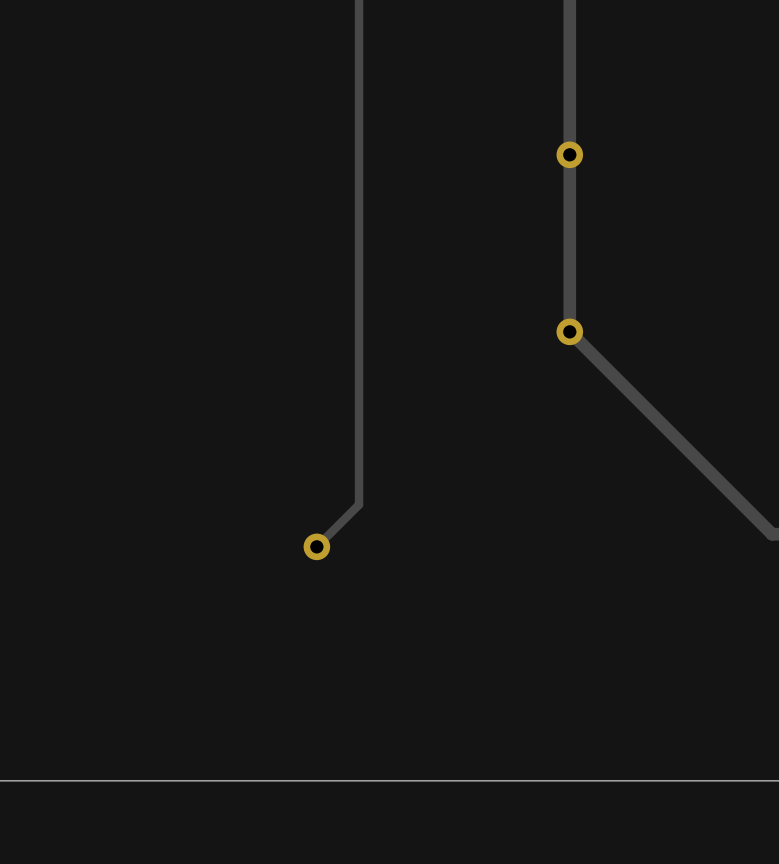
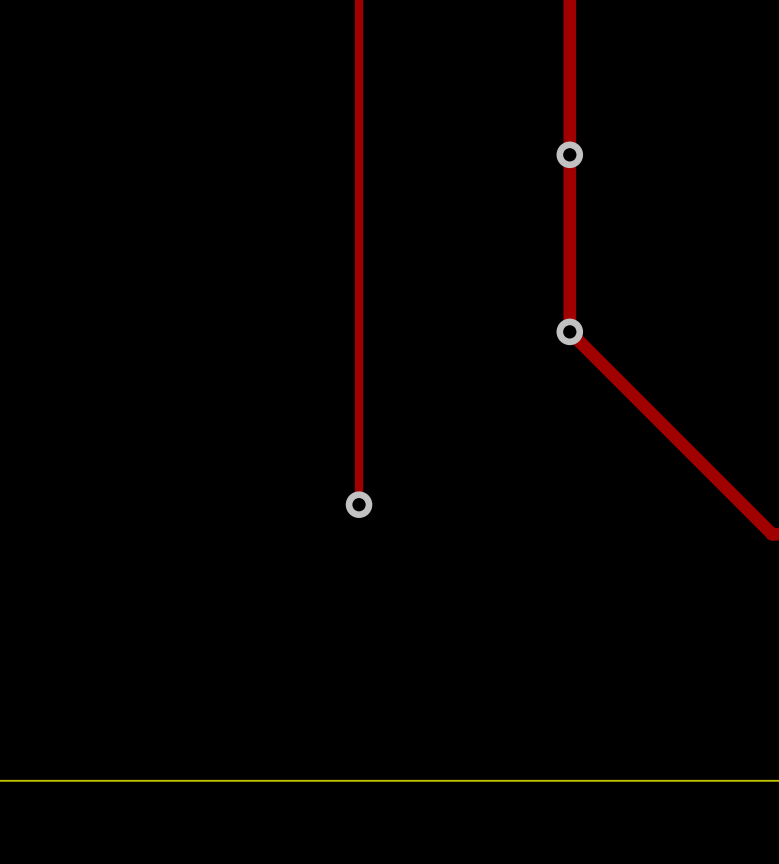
track: (359, 504) (316, 546) -> none
via position: (316, 546) -> (359, 504)

